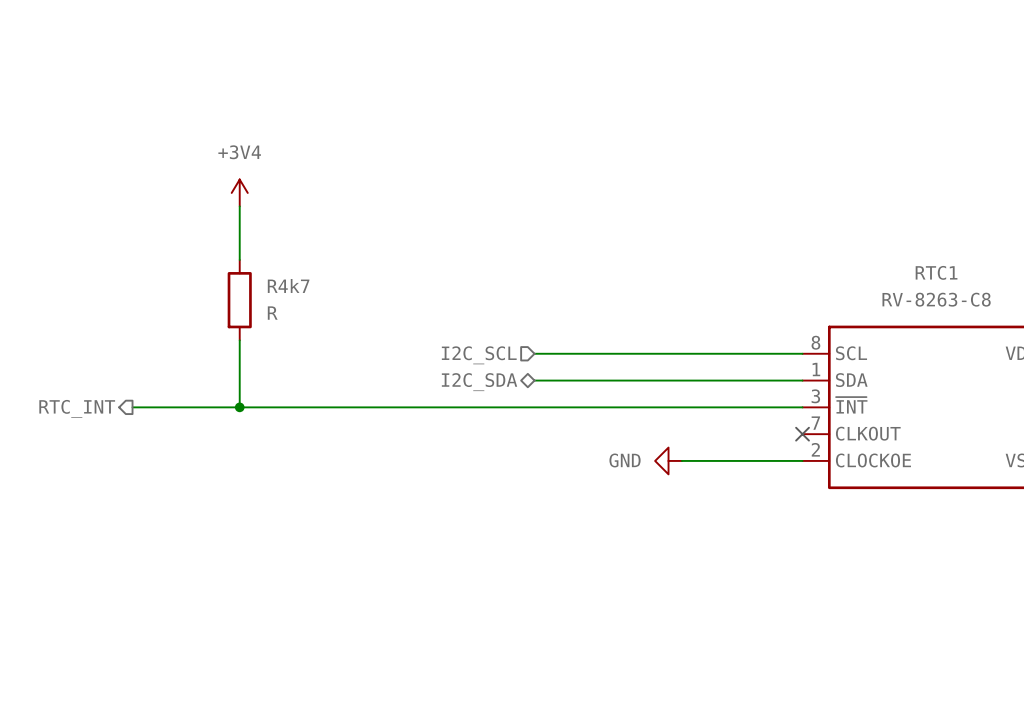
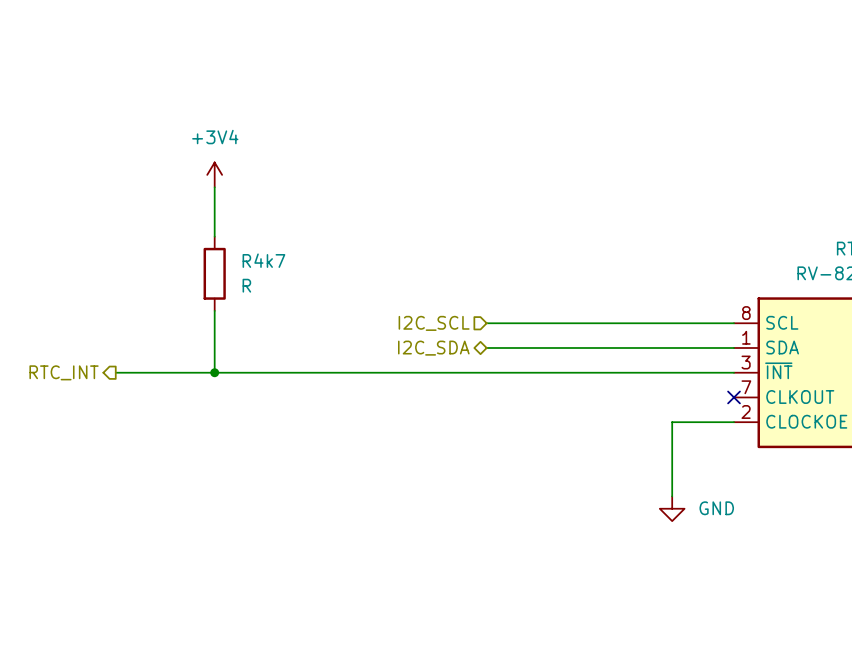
power symbol text position: GND (625, 460) -> GND (716, 508)
power symbol rotation: 0° (668, 460) -> 90° counterclockwise (672, 508)
power symbol position: GND (668, 460) -> GND (672, 508)
wire: (681, 460) (735, 460) -> (672, 496) (672, 422)

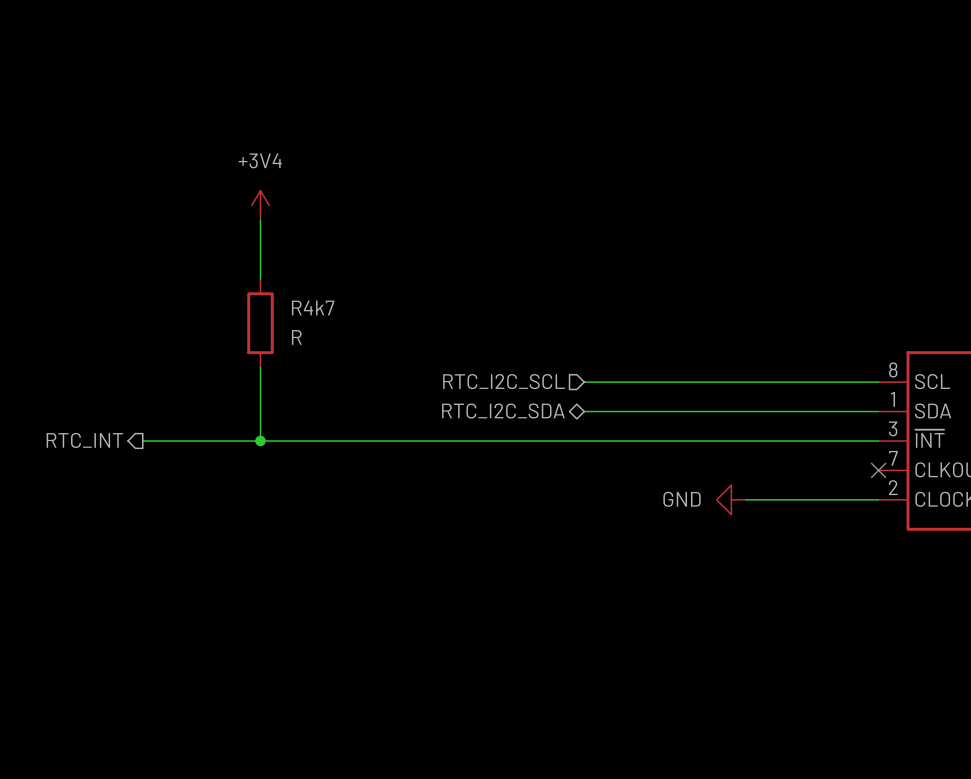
hierarchical label: I2C_SCL (434, 323) -> RTC_I2C_SCL (503, 381)
hierarchical label: I2C_SDA (433, 348) -> RTC_I2C_SDA (503, 411)
wire: (672, 422) (672, 496) -> (804, 499) (746, 499)
power symbol rotation: 0° (672, 508) -> 90° clockwise (731, 499)
power symbol position: GND (672, 508) -> GND (731, 499)
power symbol text position: GND (716, 508) -> GND (682, 499)

